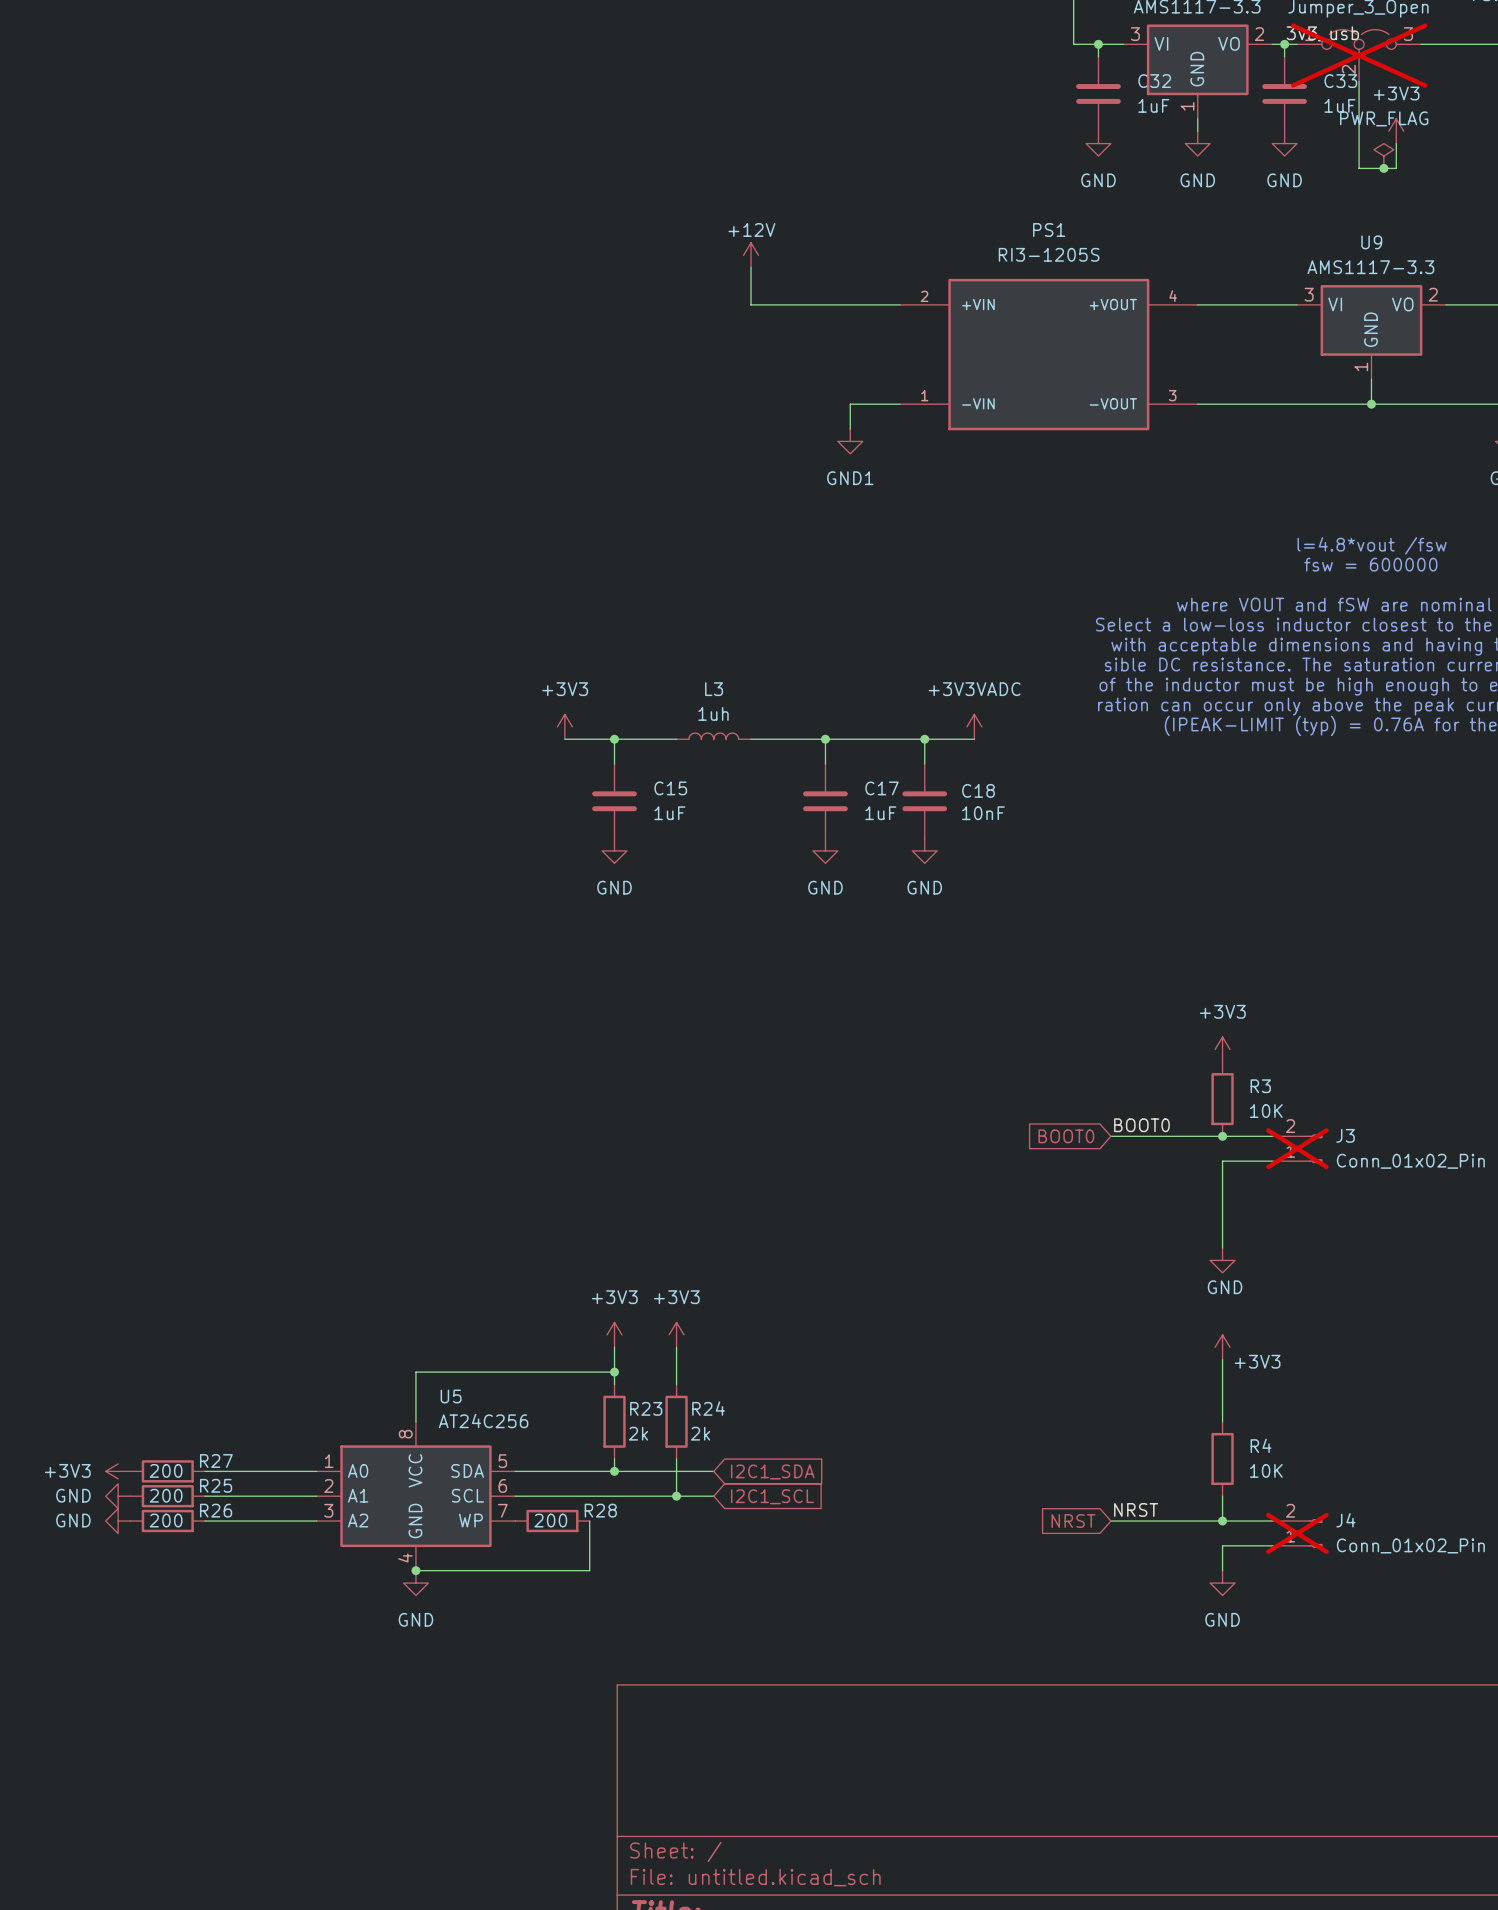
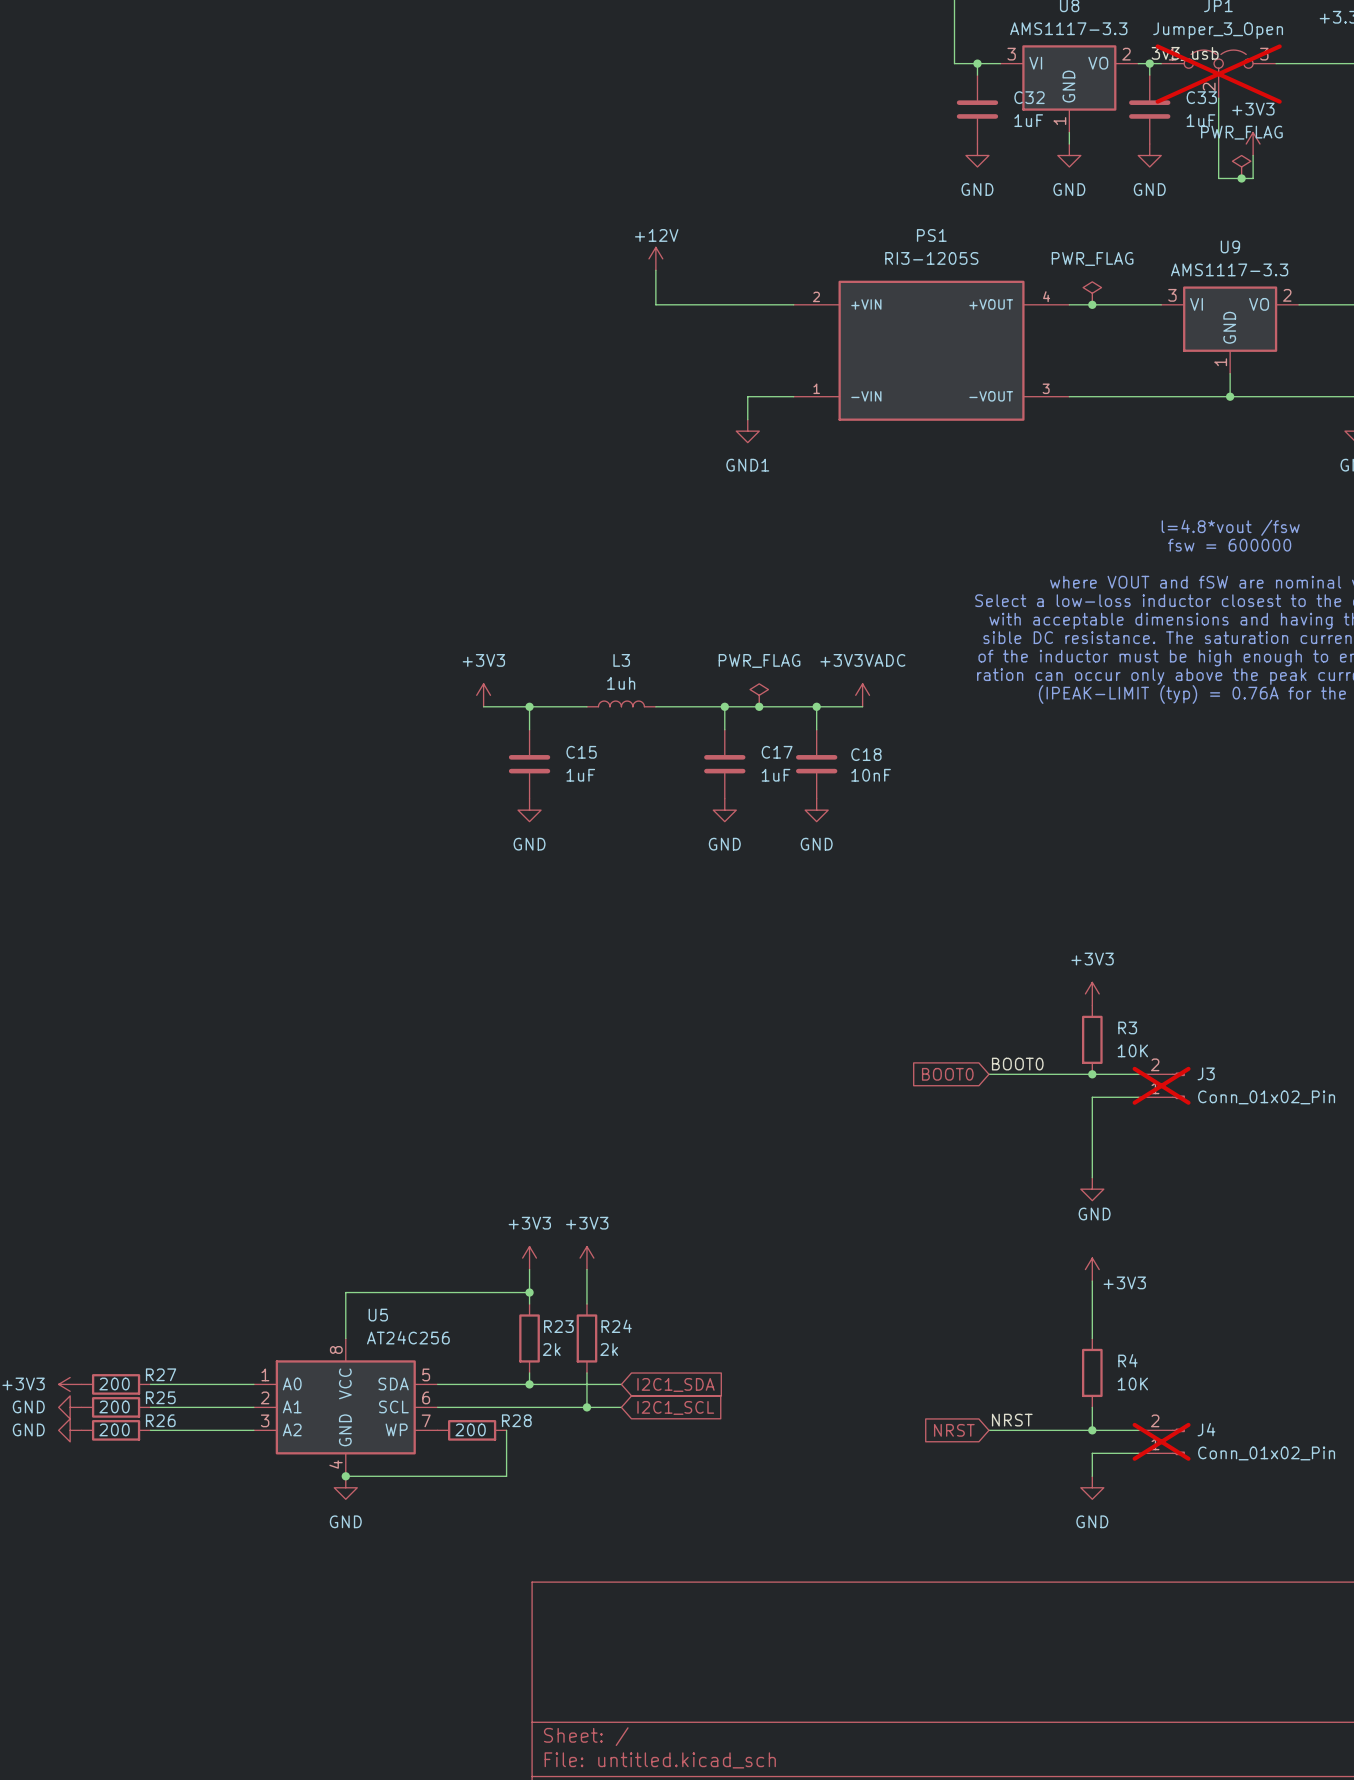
power symbol: none -> PWR_FLAG (1092, 293)
junction: none -> (1092, 304)
power symbol: none -> PWR_FLAG (759, 695)
junction: none -> (759, 706)

